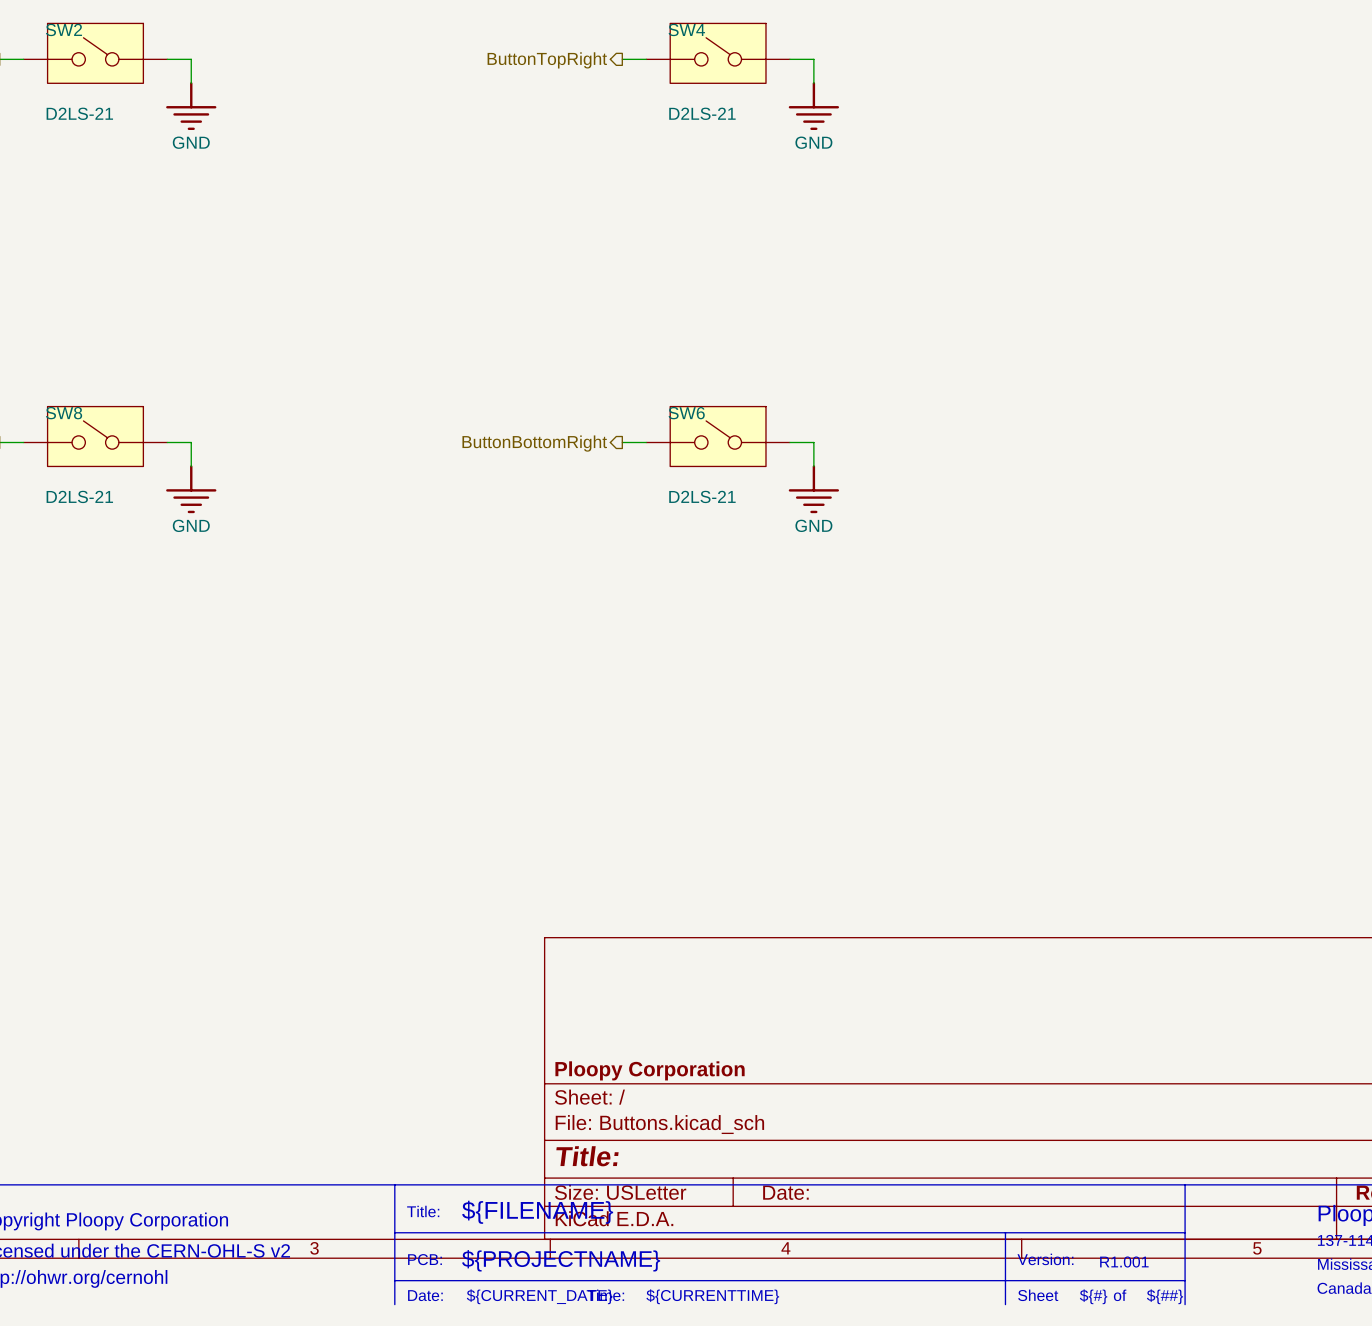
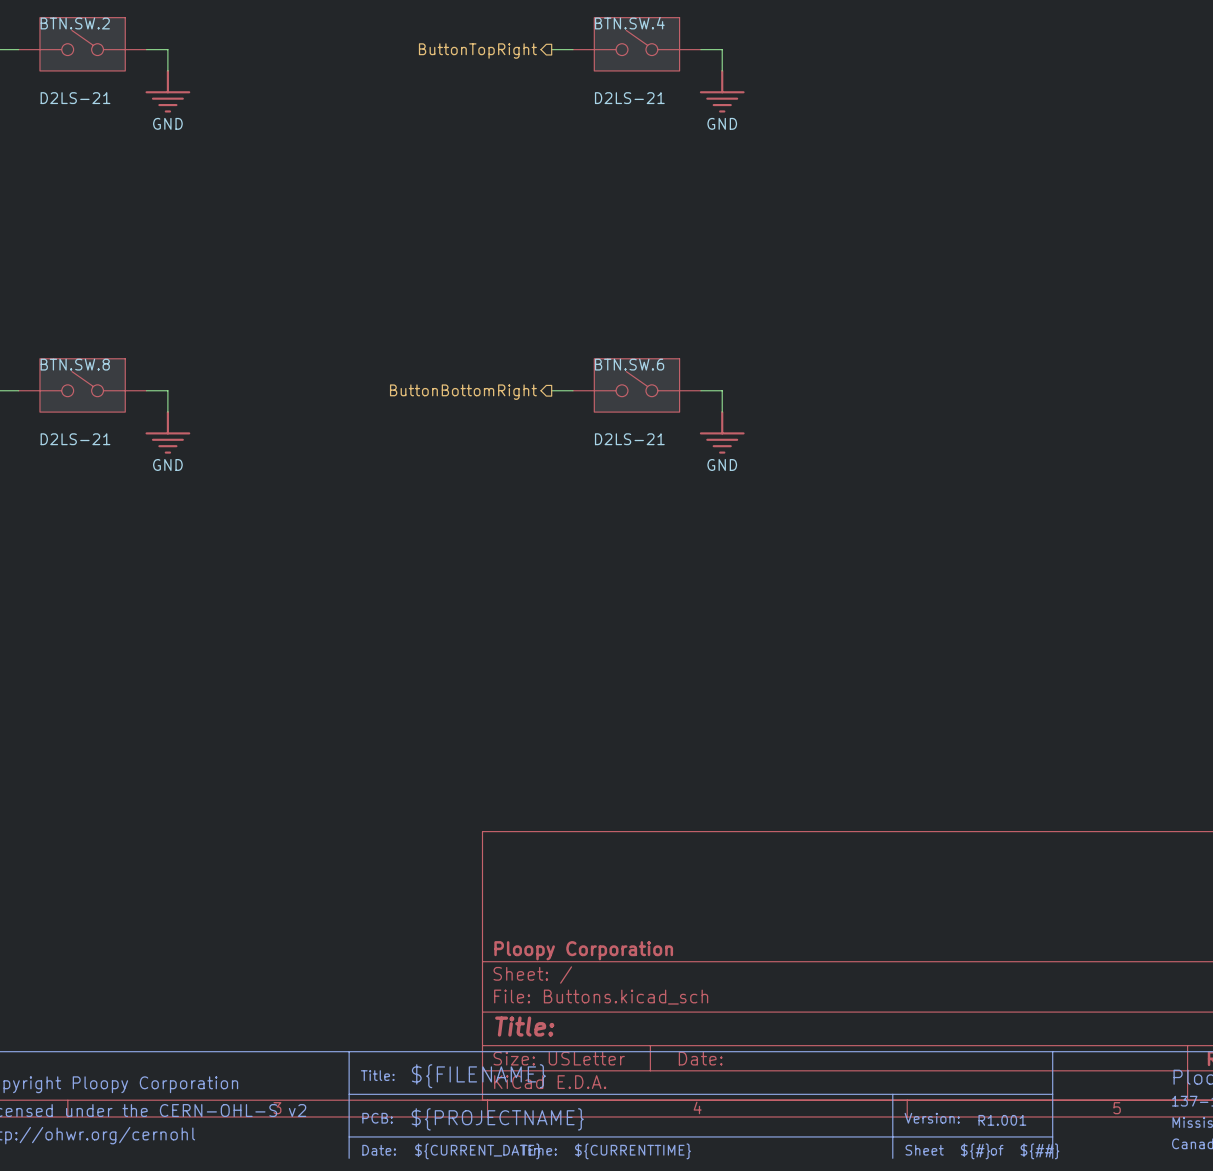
SW2 name: SW2 (64, 29) -> BTN.SW.2 (75, 23)
SW4 name: SW4 (686, 29) -> BTN.SW.4 (629, 23)
SW8 name: SW8 (64, 413) -> BTN.SW.8 (75, 364)
SW6 name: SW6 (686, 413) -> BTN.SW.6 (629, 364)

